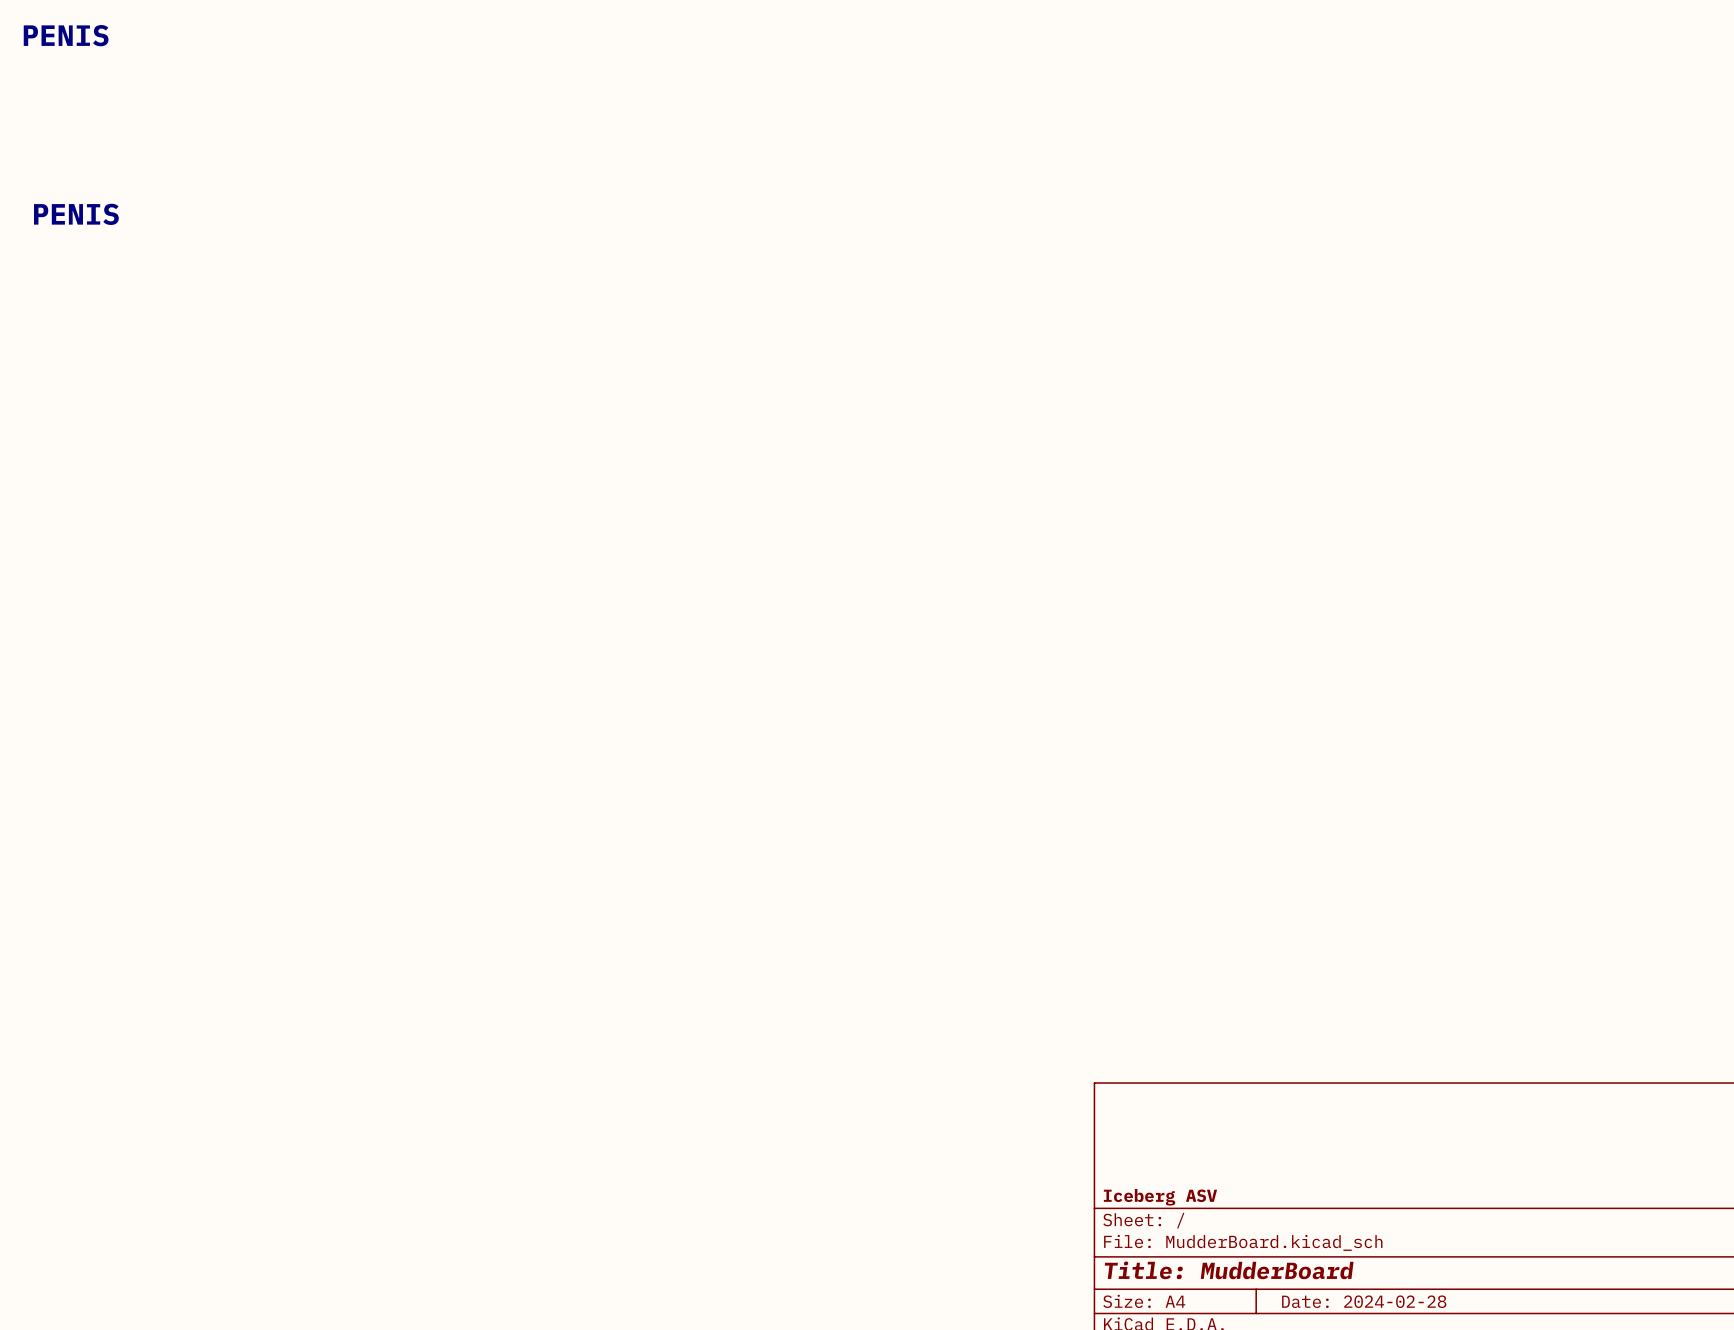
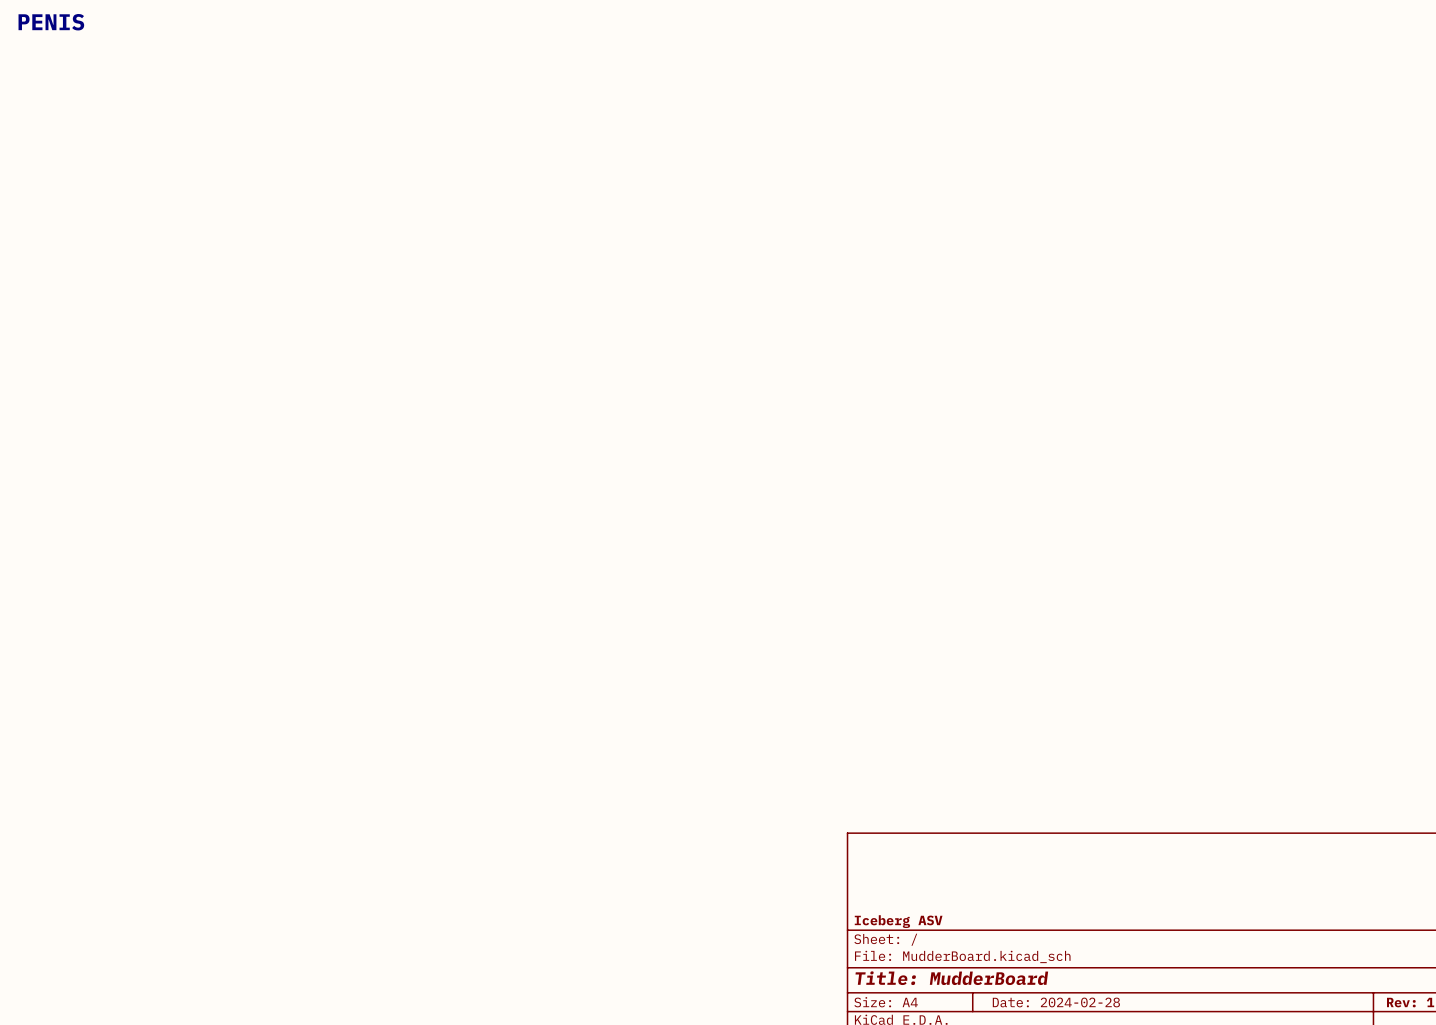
text: PENIS (76, 214) -> none

